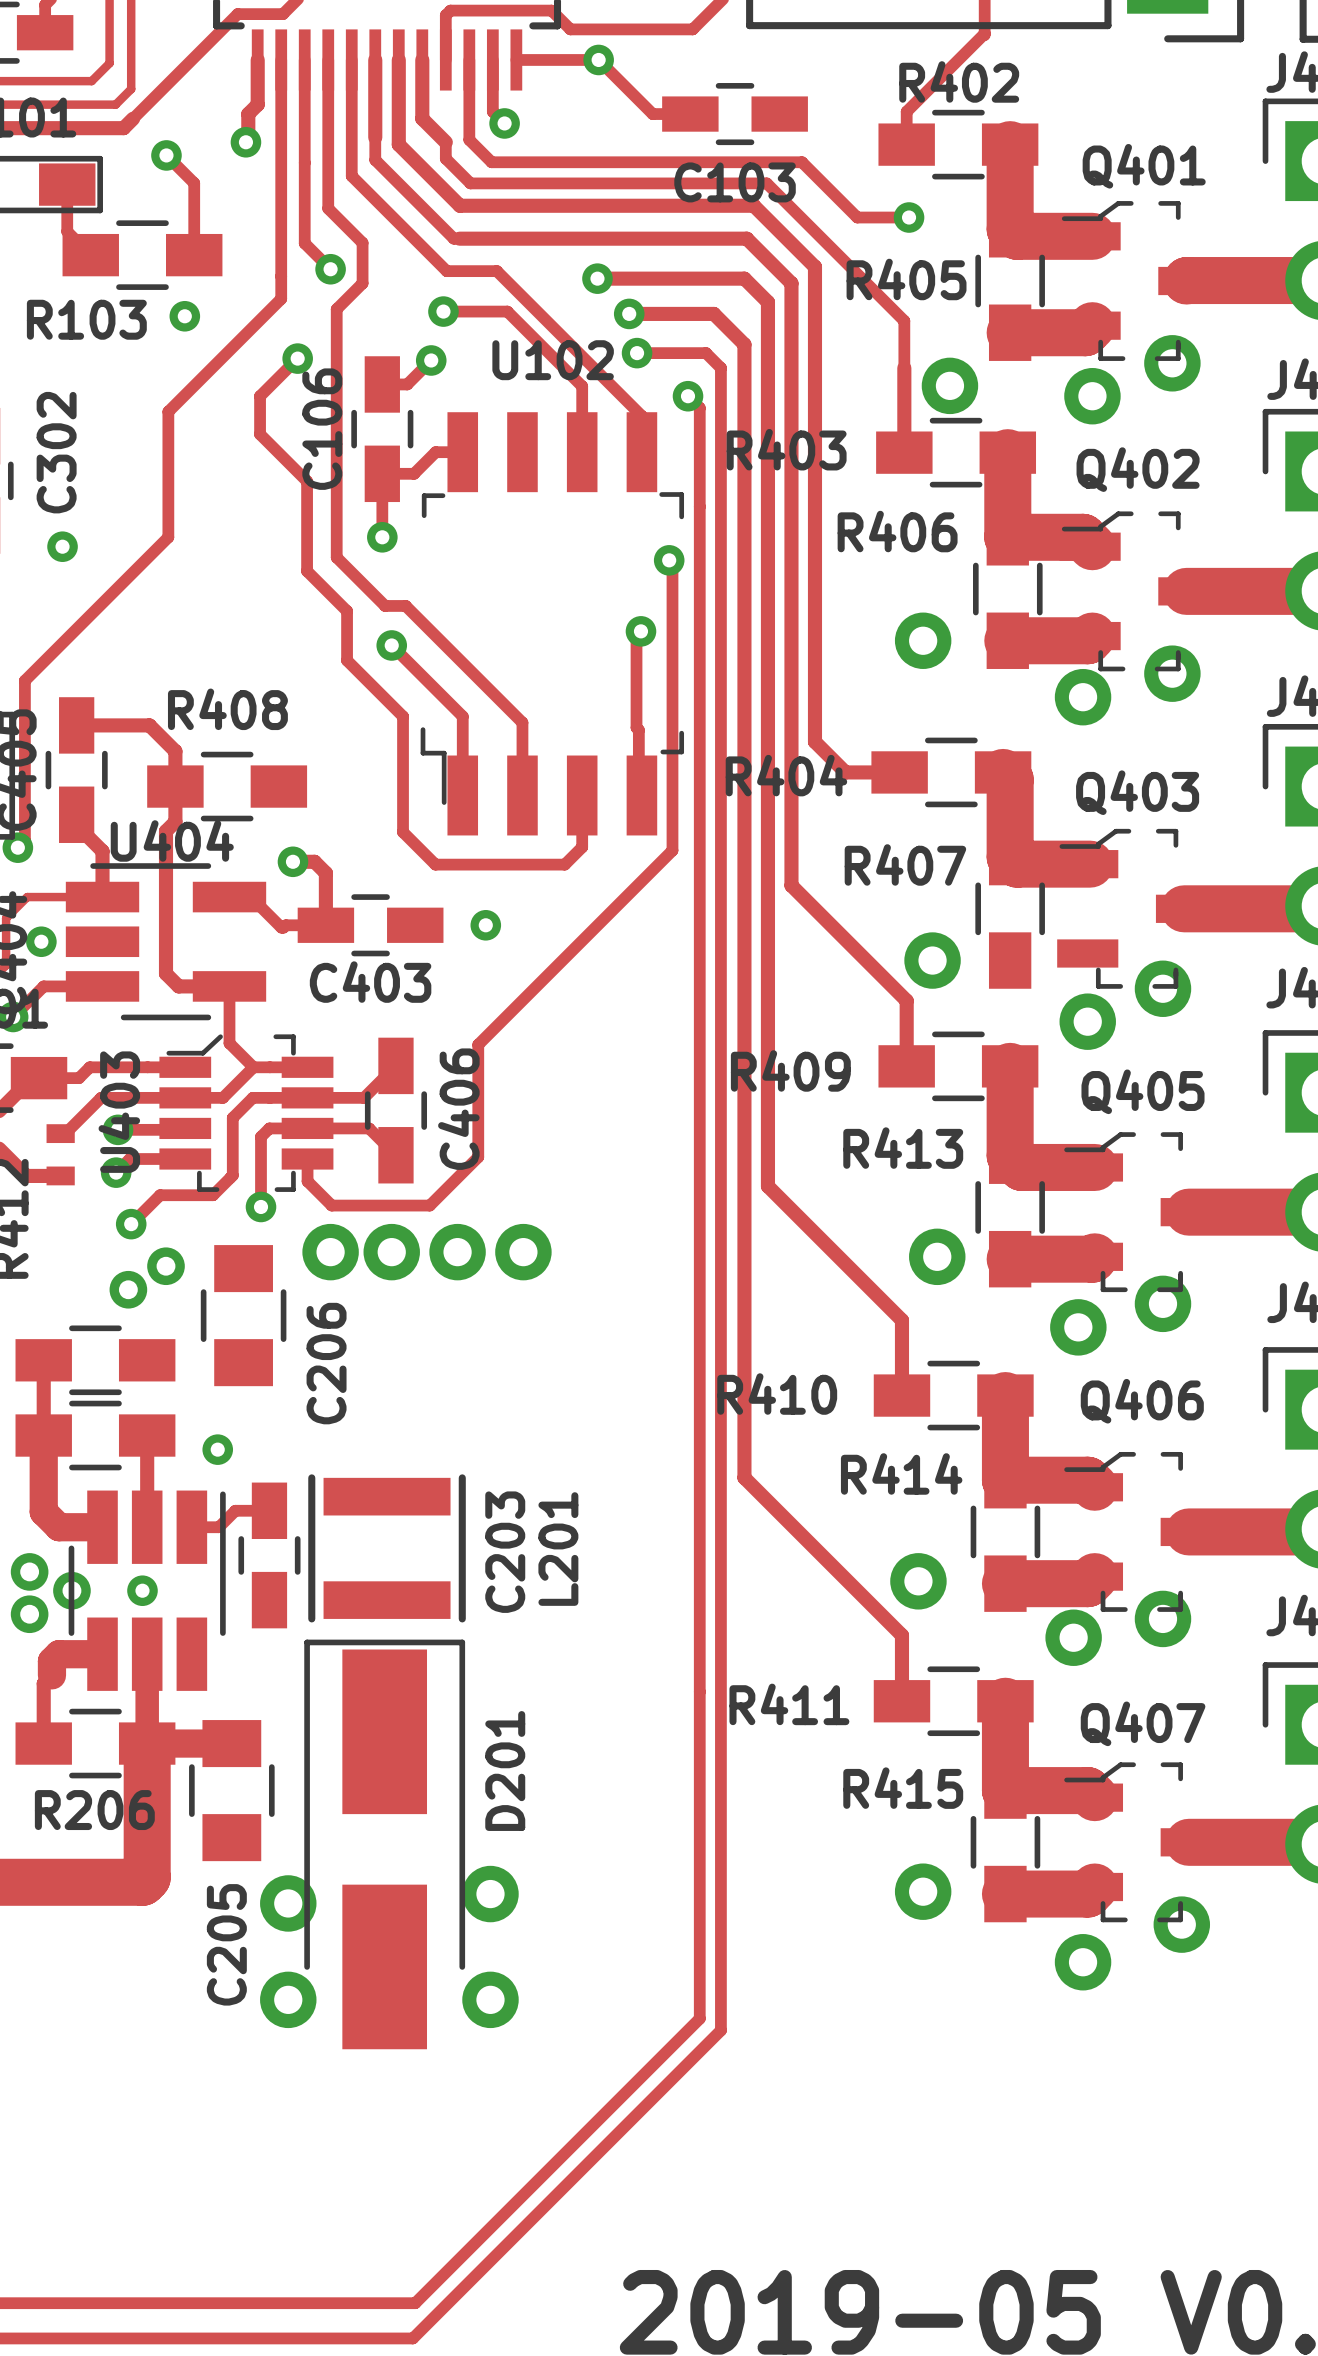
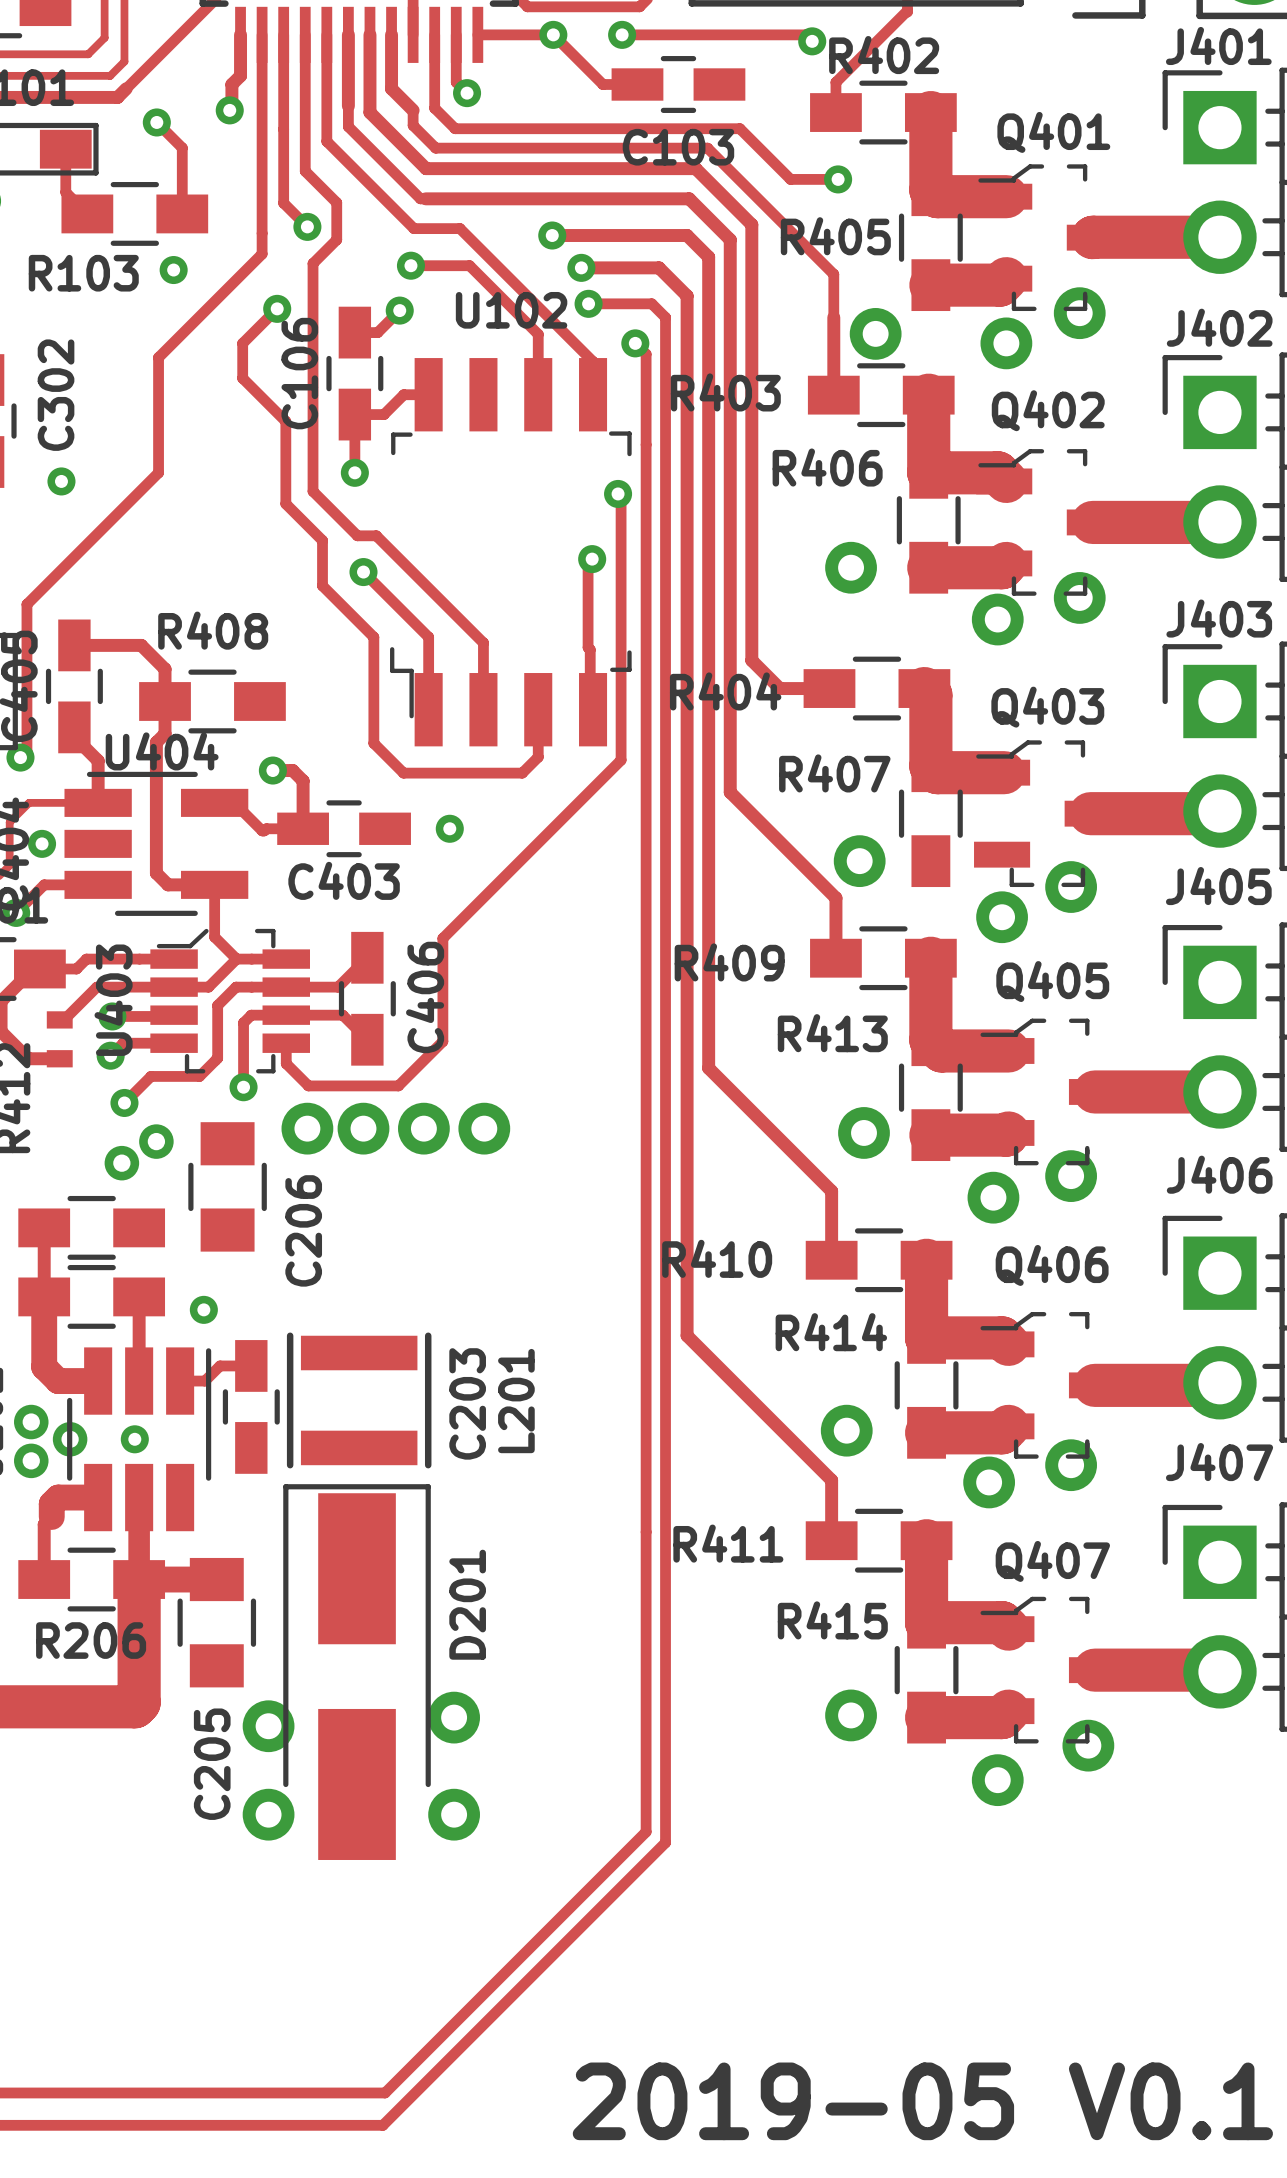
track: none -> (622, 34) (805, 34) (812, 41)
via: none -> (622, 34)
via: none -> (812, 41)

